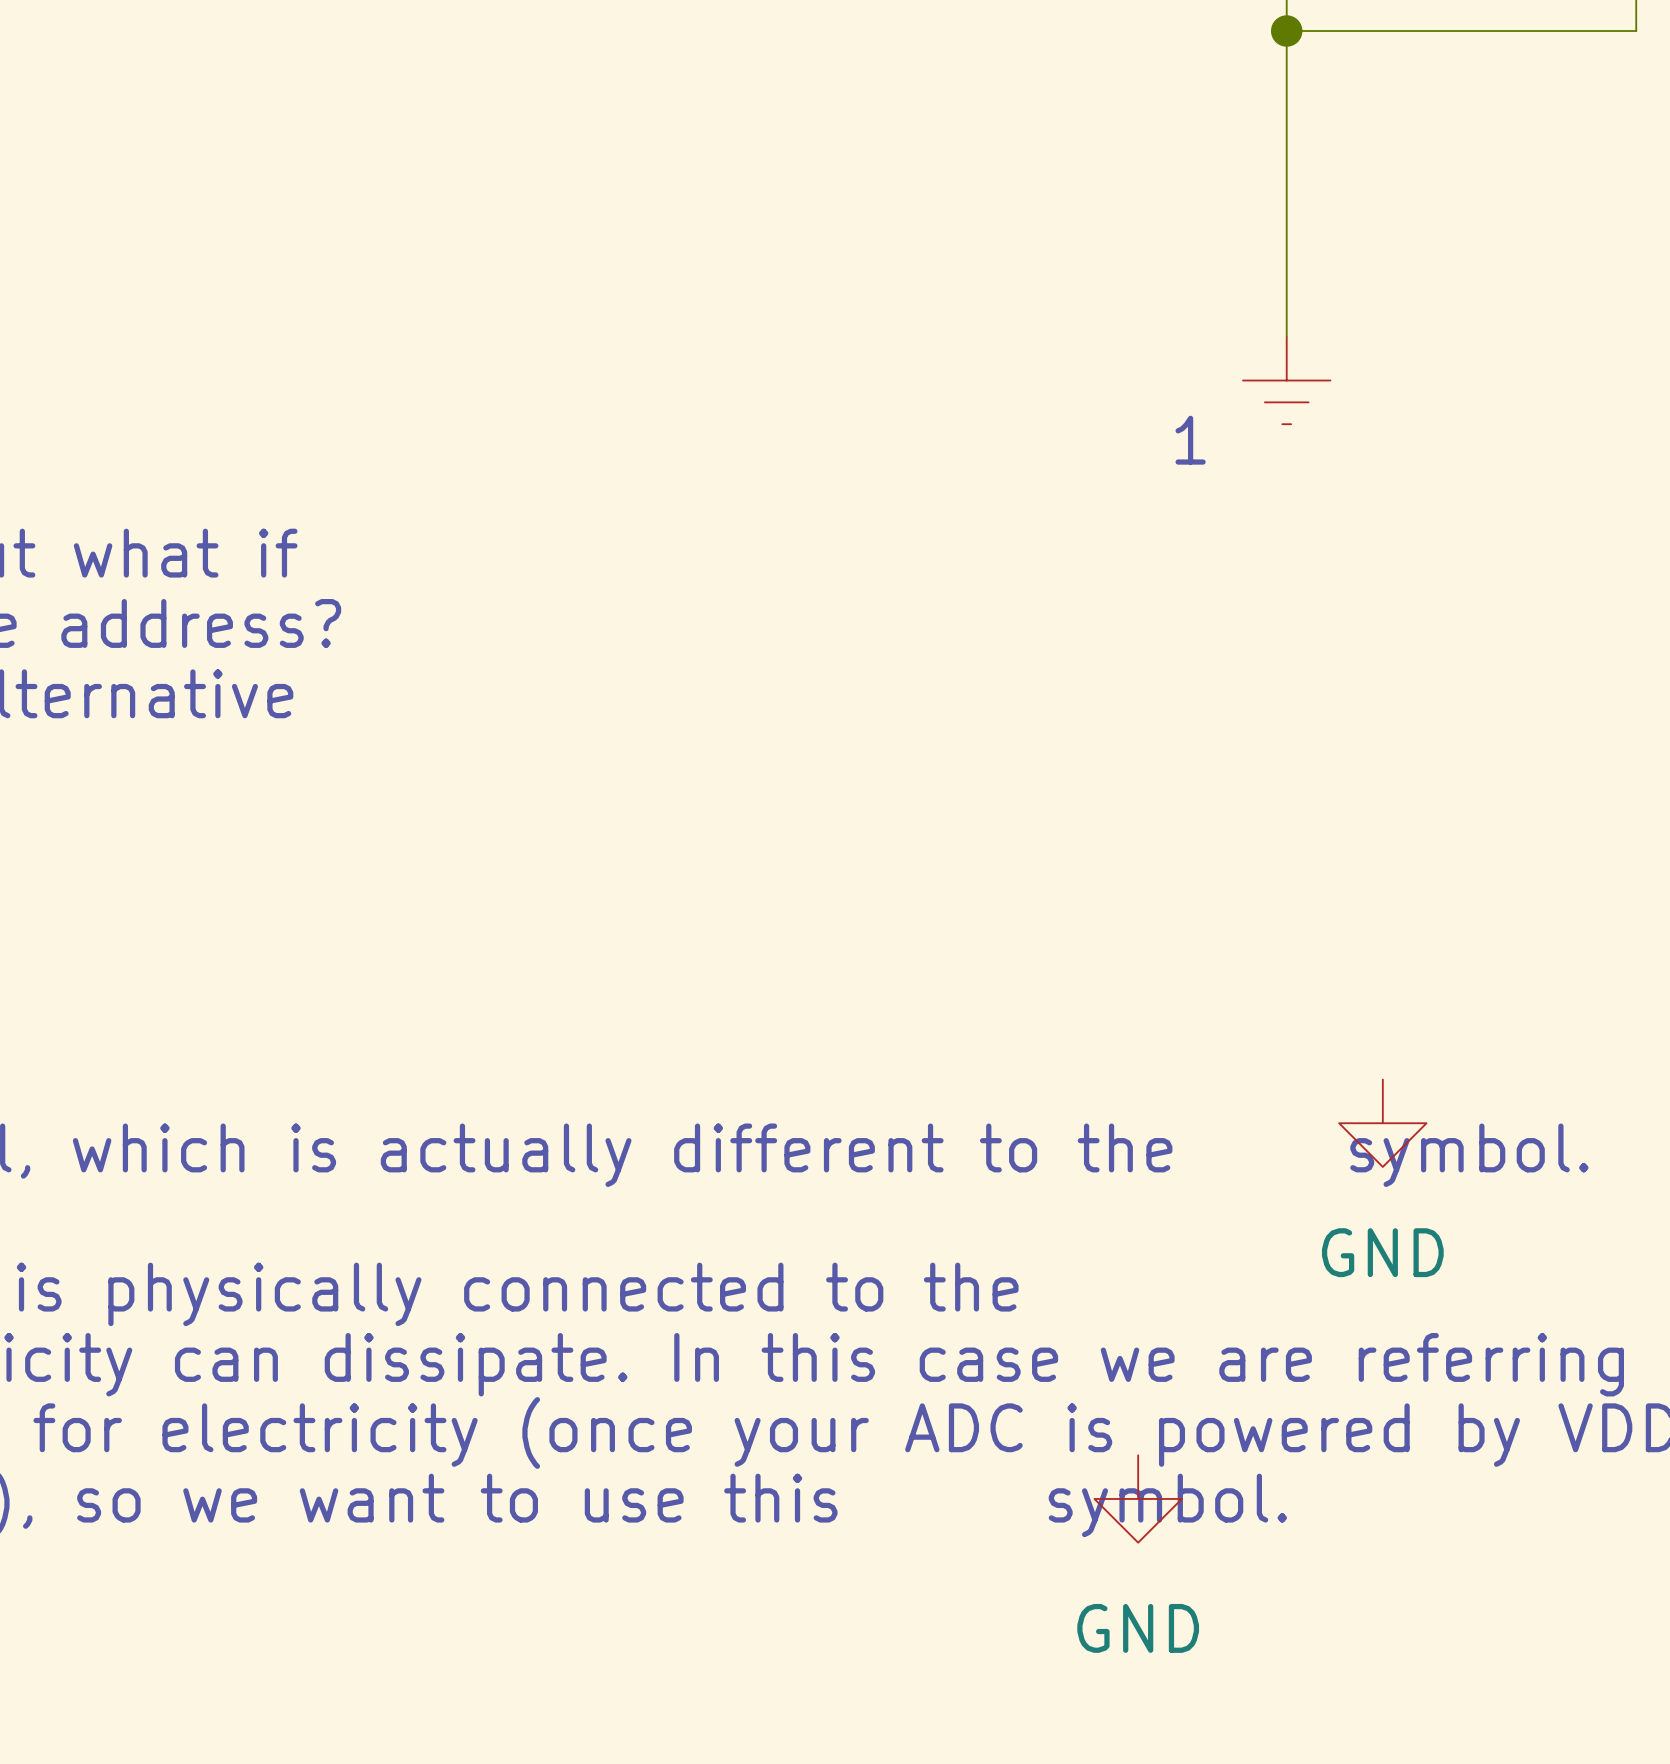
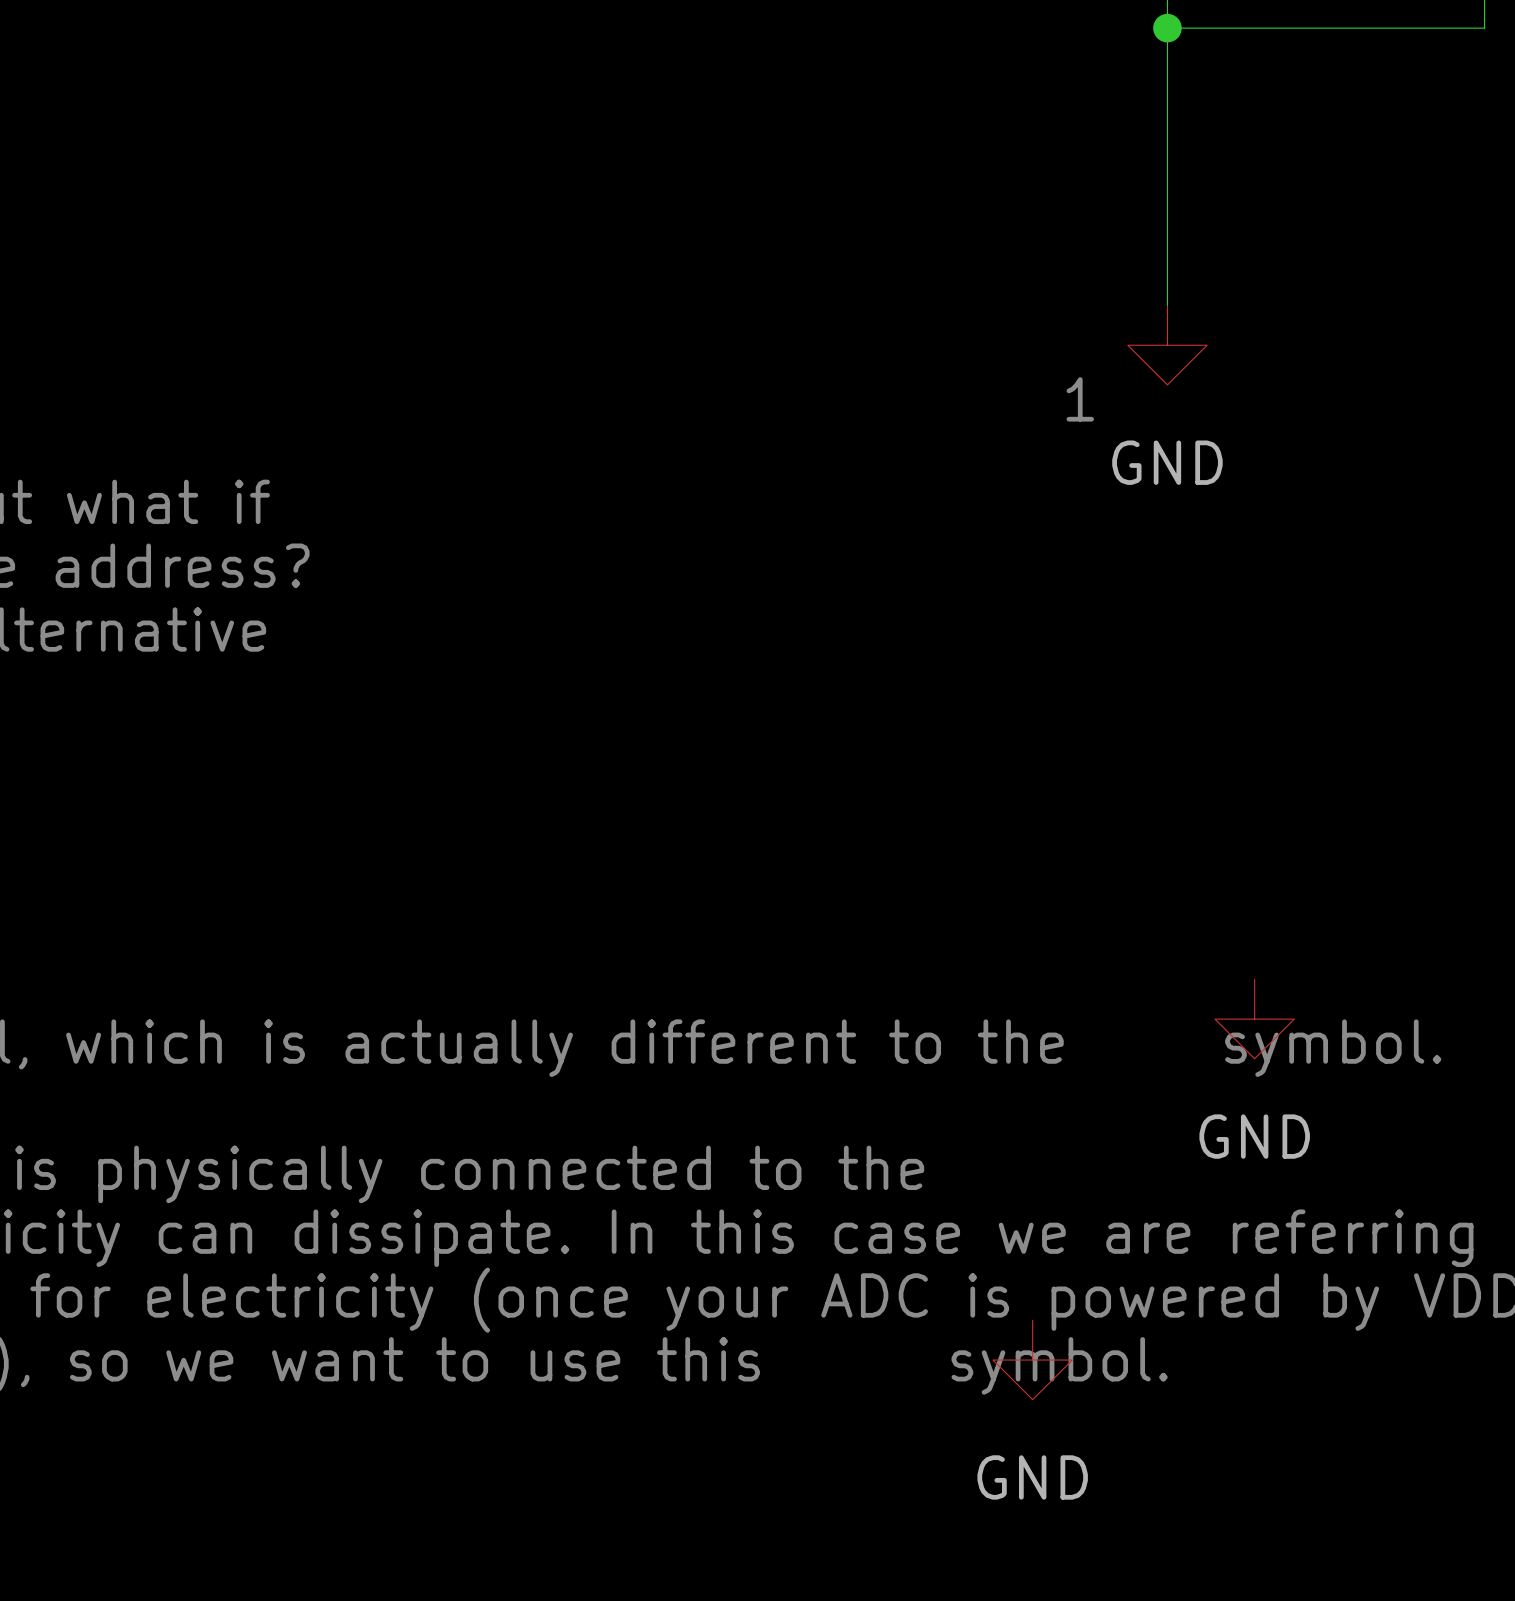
power symbol shape: [1243, 336, 1331, 425] -> [1127, 305, 1208, 385]
power symbol text: none -> GND (1167, 462)

